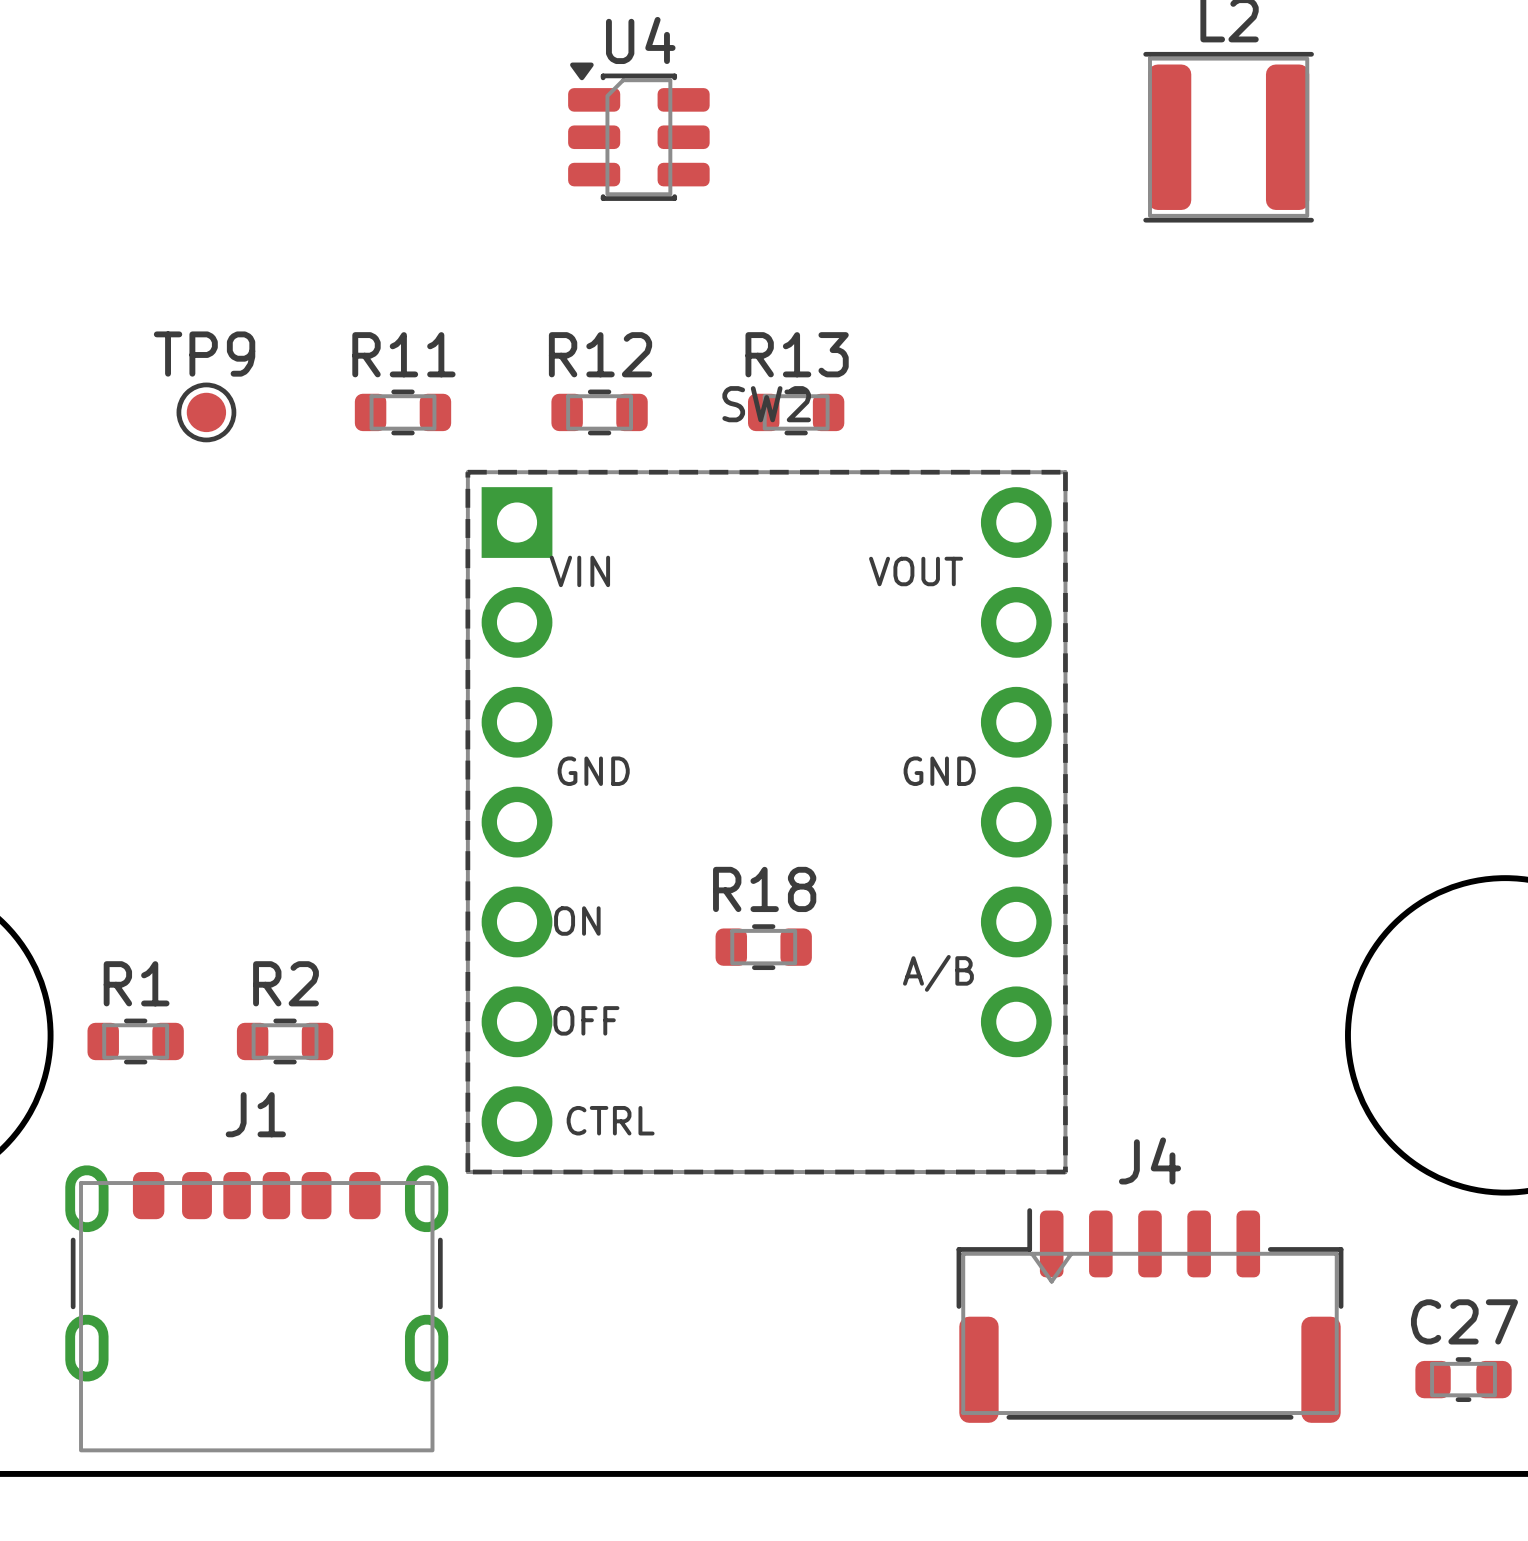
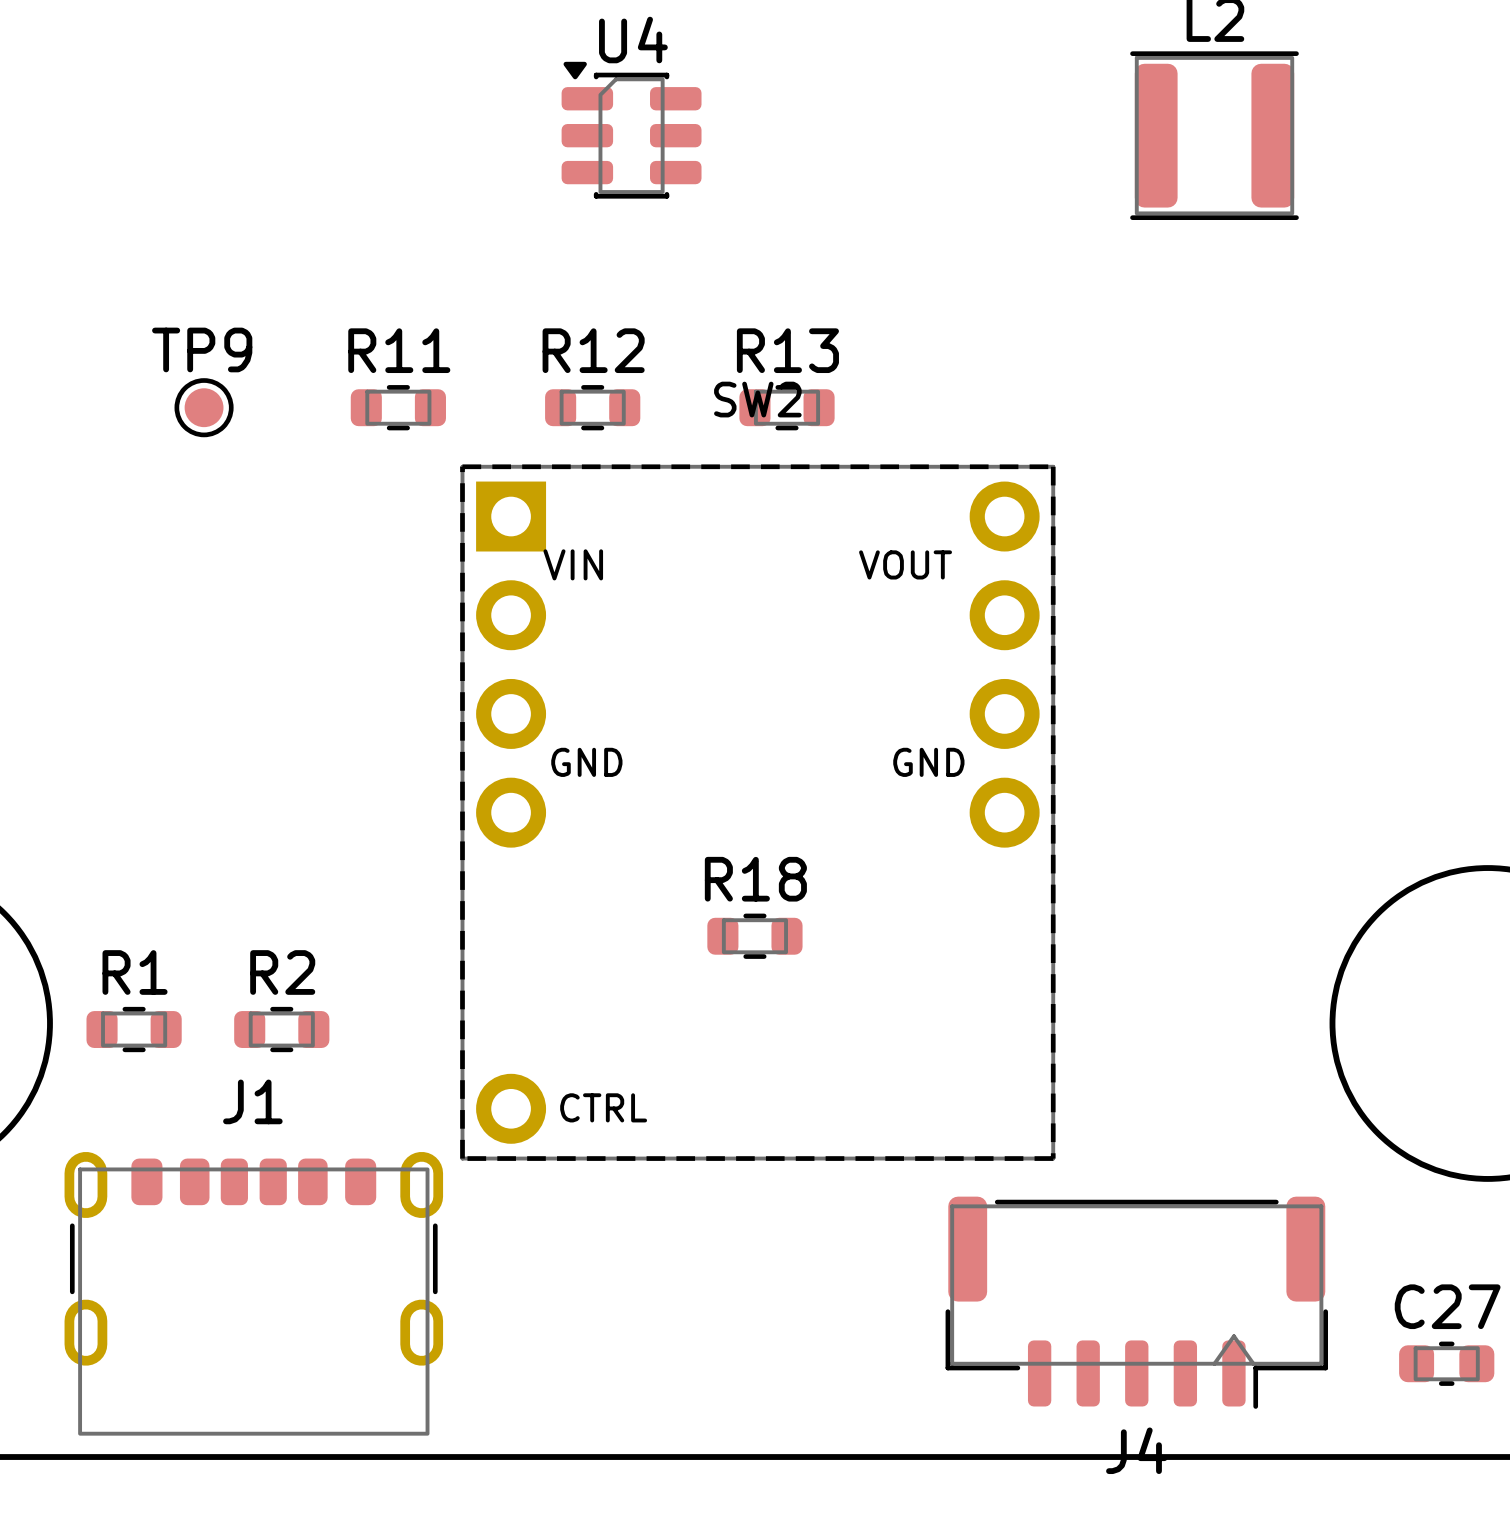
SW2 footprint: [465, 469, 1068, 1175] -> [460, 464, 1056, 1161]
J4 rotation: 0° (1149, 1315) -> 180° (1136, 1302)

